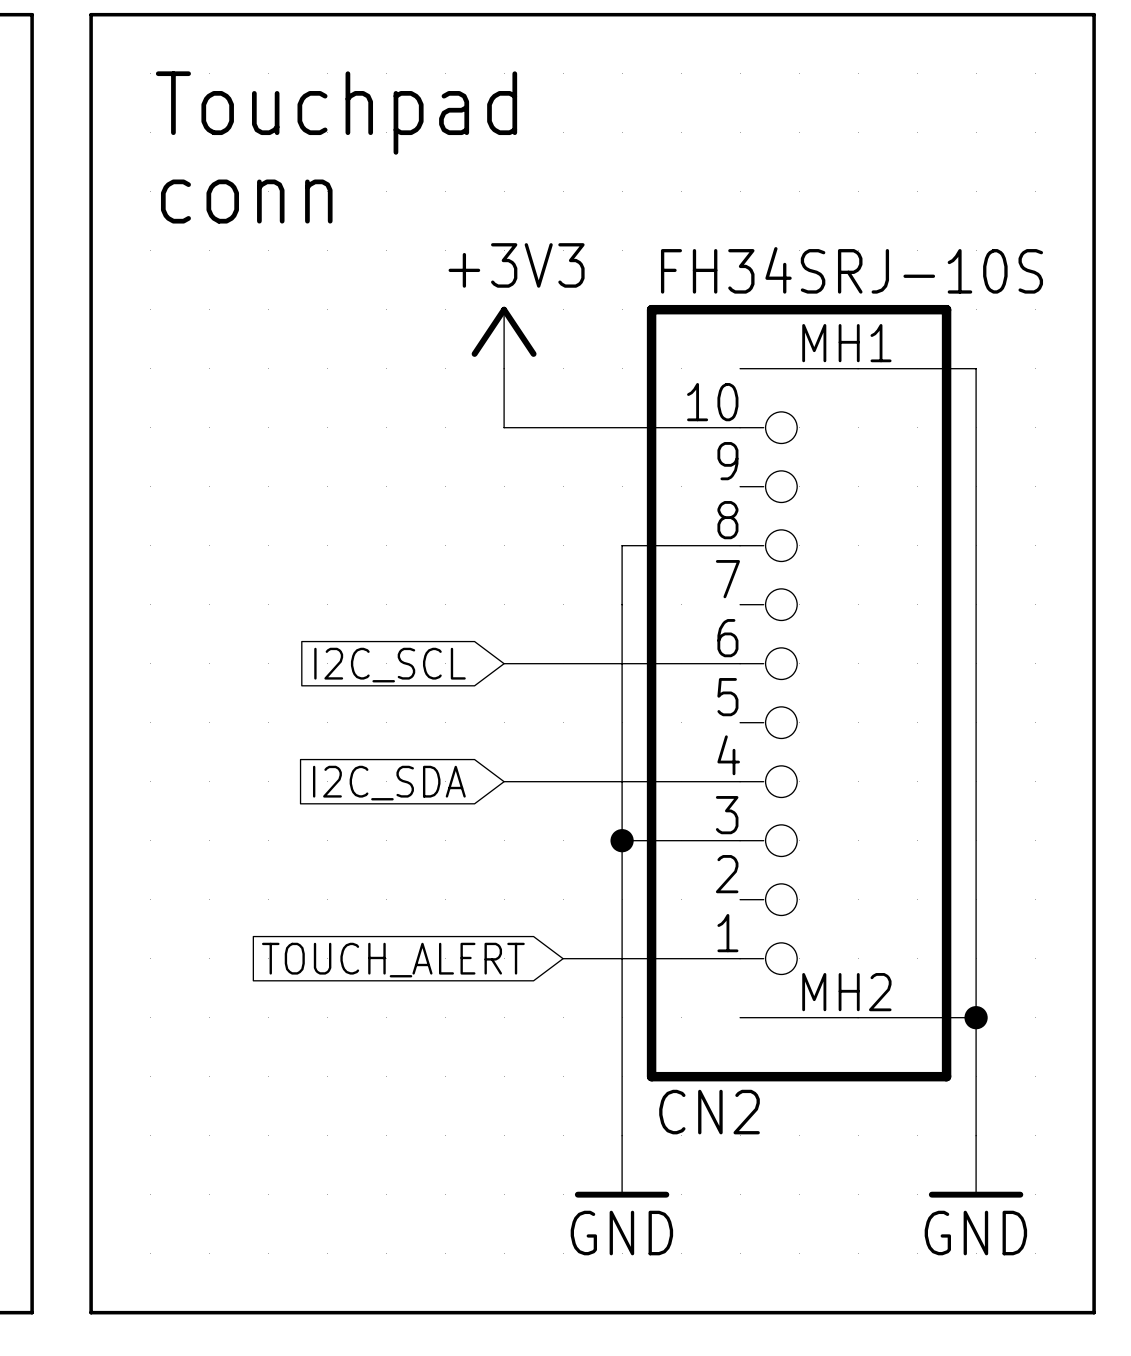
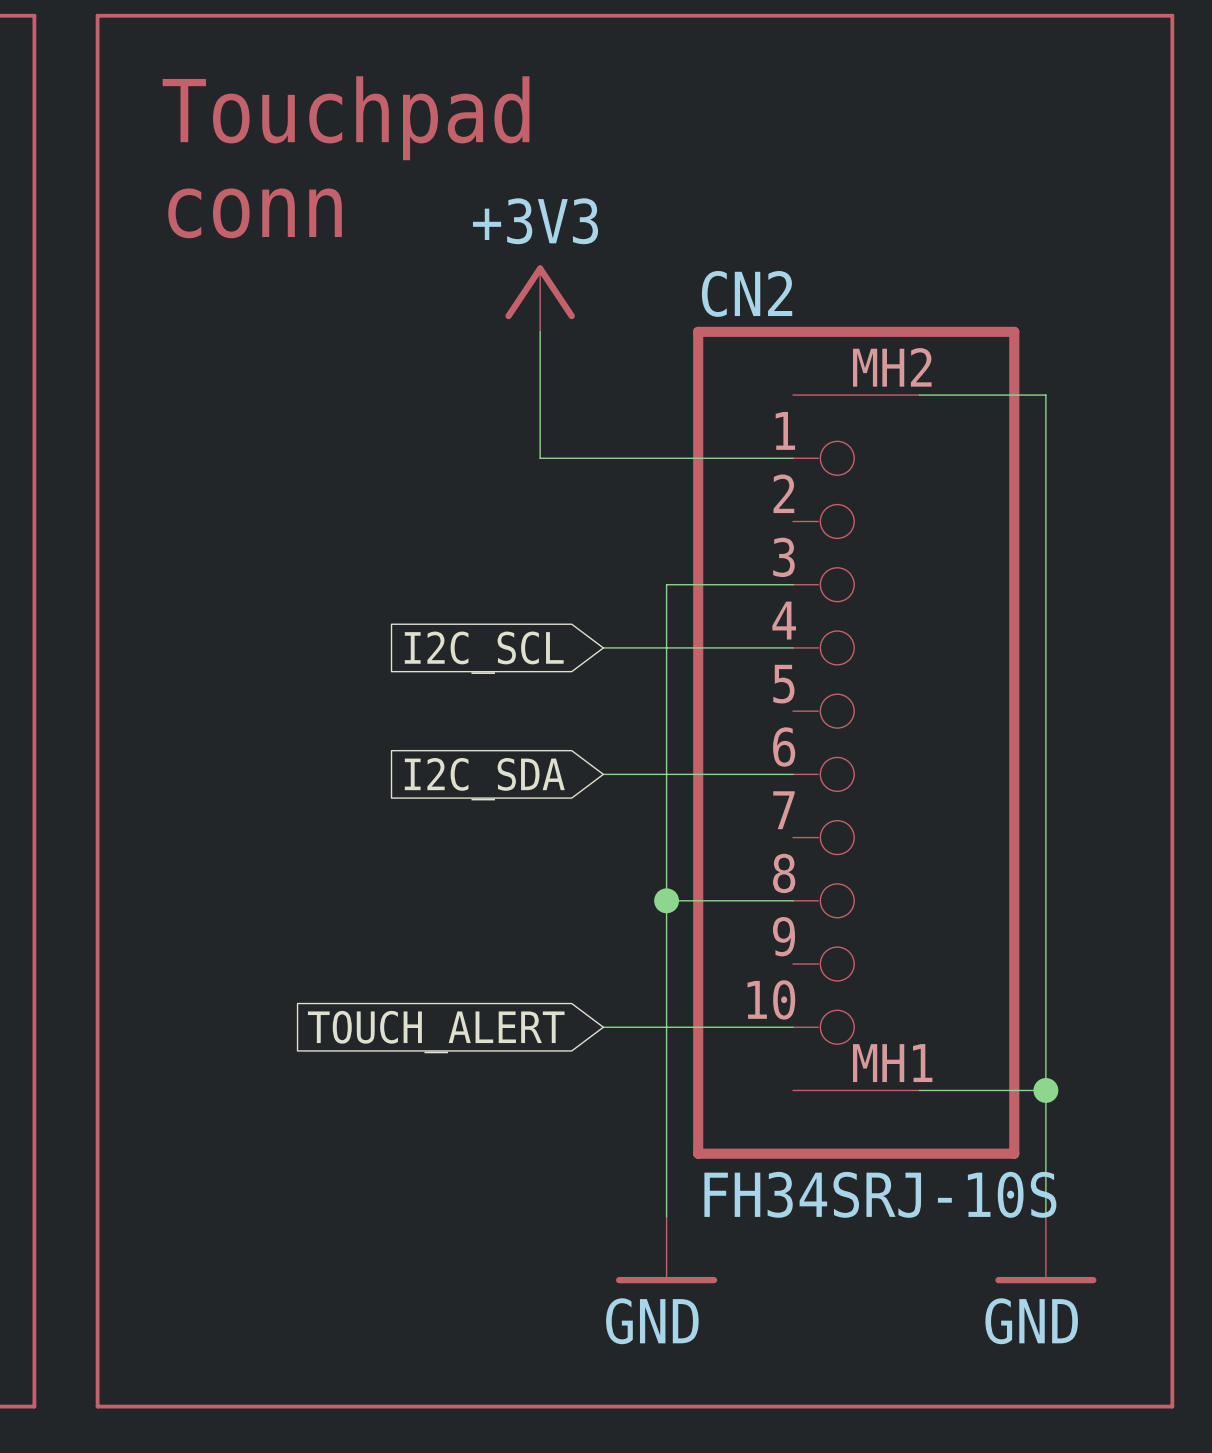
power symbol position: +3V3 (504, 337) -> +3V3 (540, 298)
wire: none -> (603, 647) (793, 647)
wire: (504, 663) (740, 663) -> none
global label position: I2C_SCL (390, 665) -> I2C_SCL (484, 652)
CN2 flip: as is (799, 693) -> up-down (856, 742)
wire: none -> (603, 774) (793, 774)
wire: (504, 781) (740, 781) -> none
global label position: I2C_SDA (389, 783) -> I2C_SDA (484, 779)

